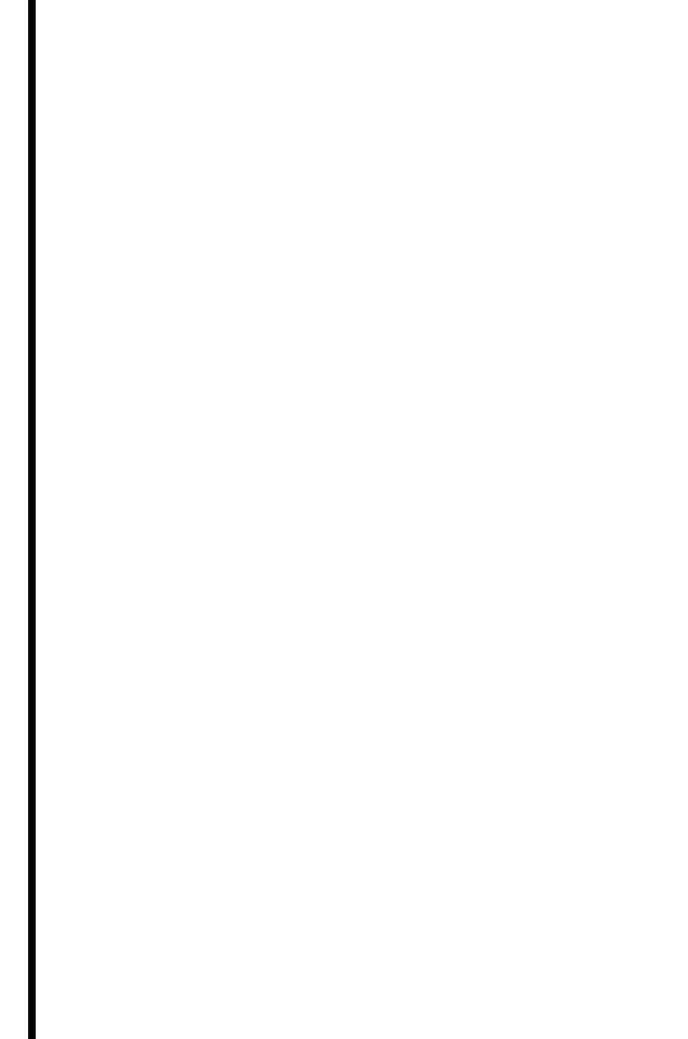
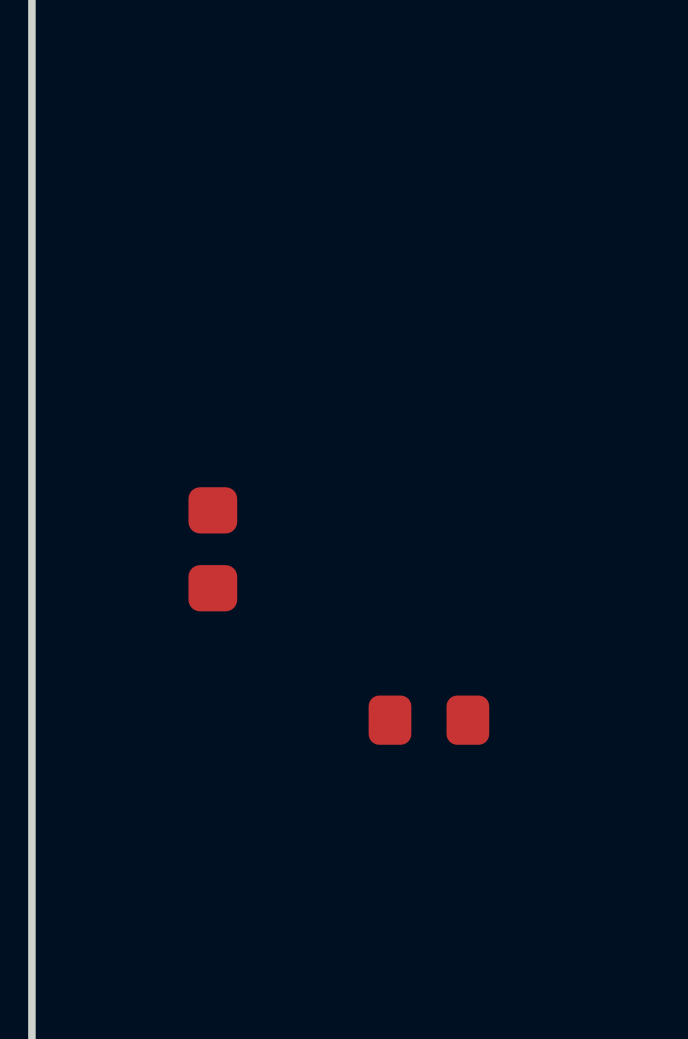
part: none -> (212, 549)
part: none -> (428, 720)

